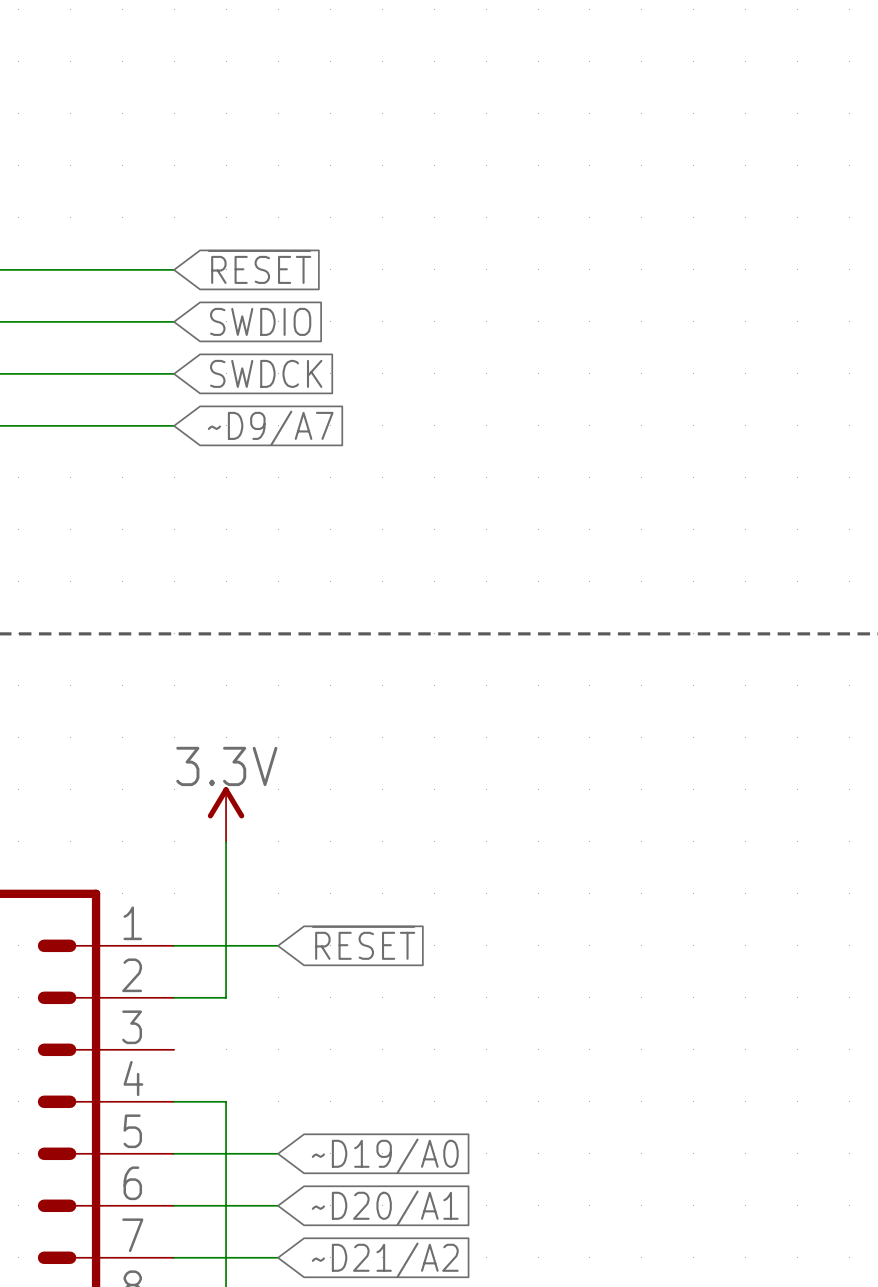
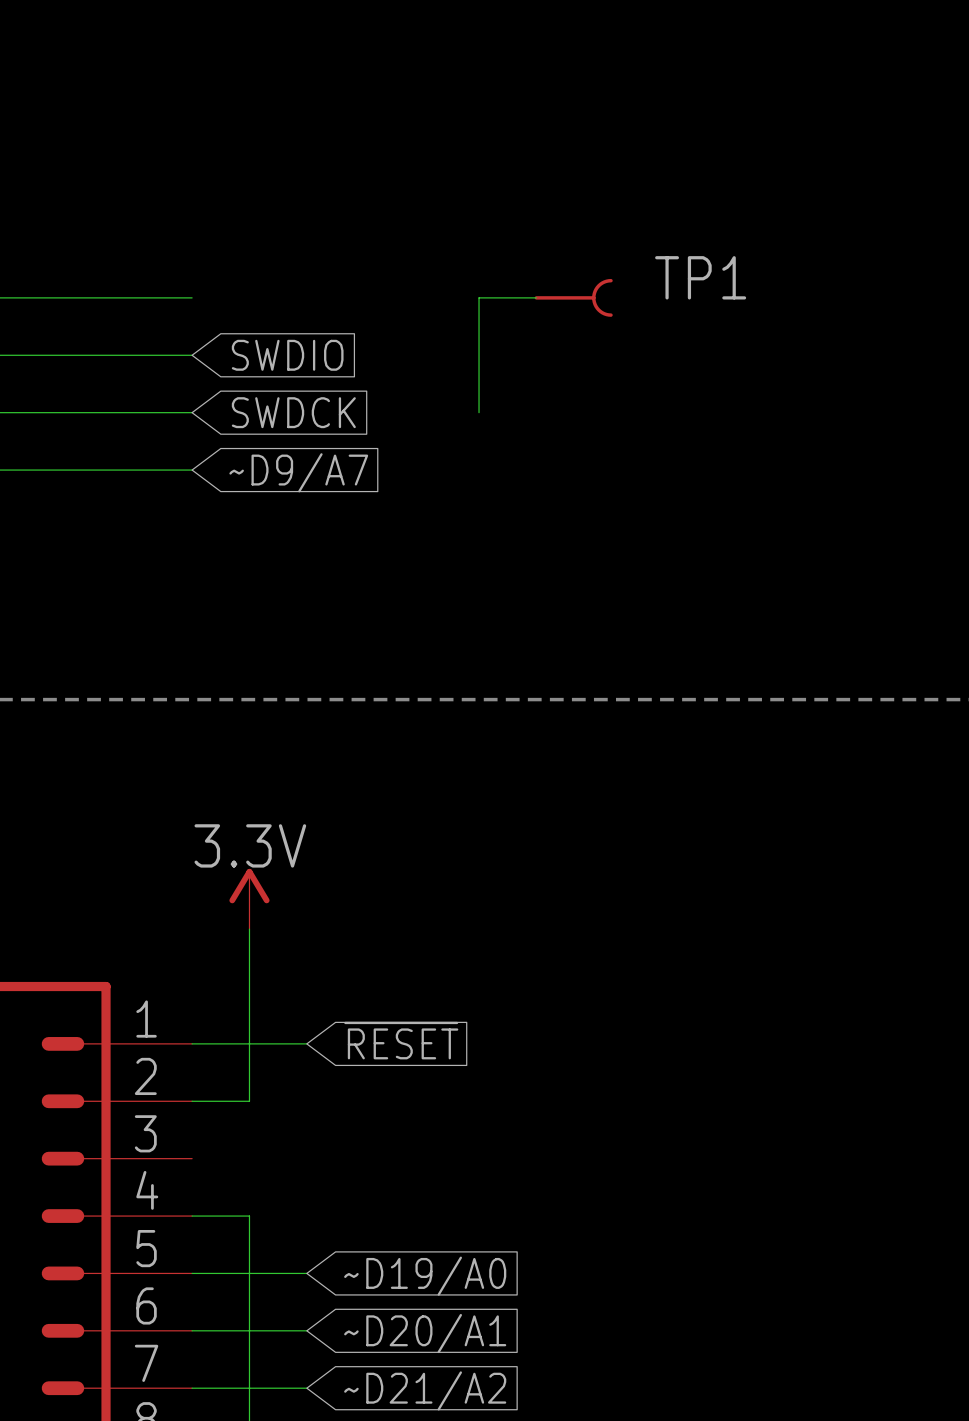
global label: ~{RESET} (259, 266) -> none
wire: none -> (536, 297) (479, 297) (479, 412)
TP1: none -> (573, 297)

